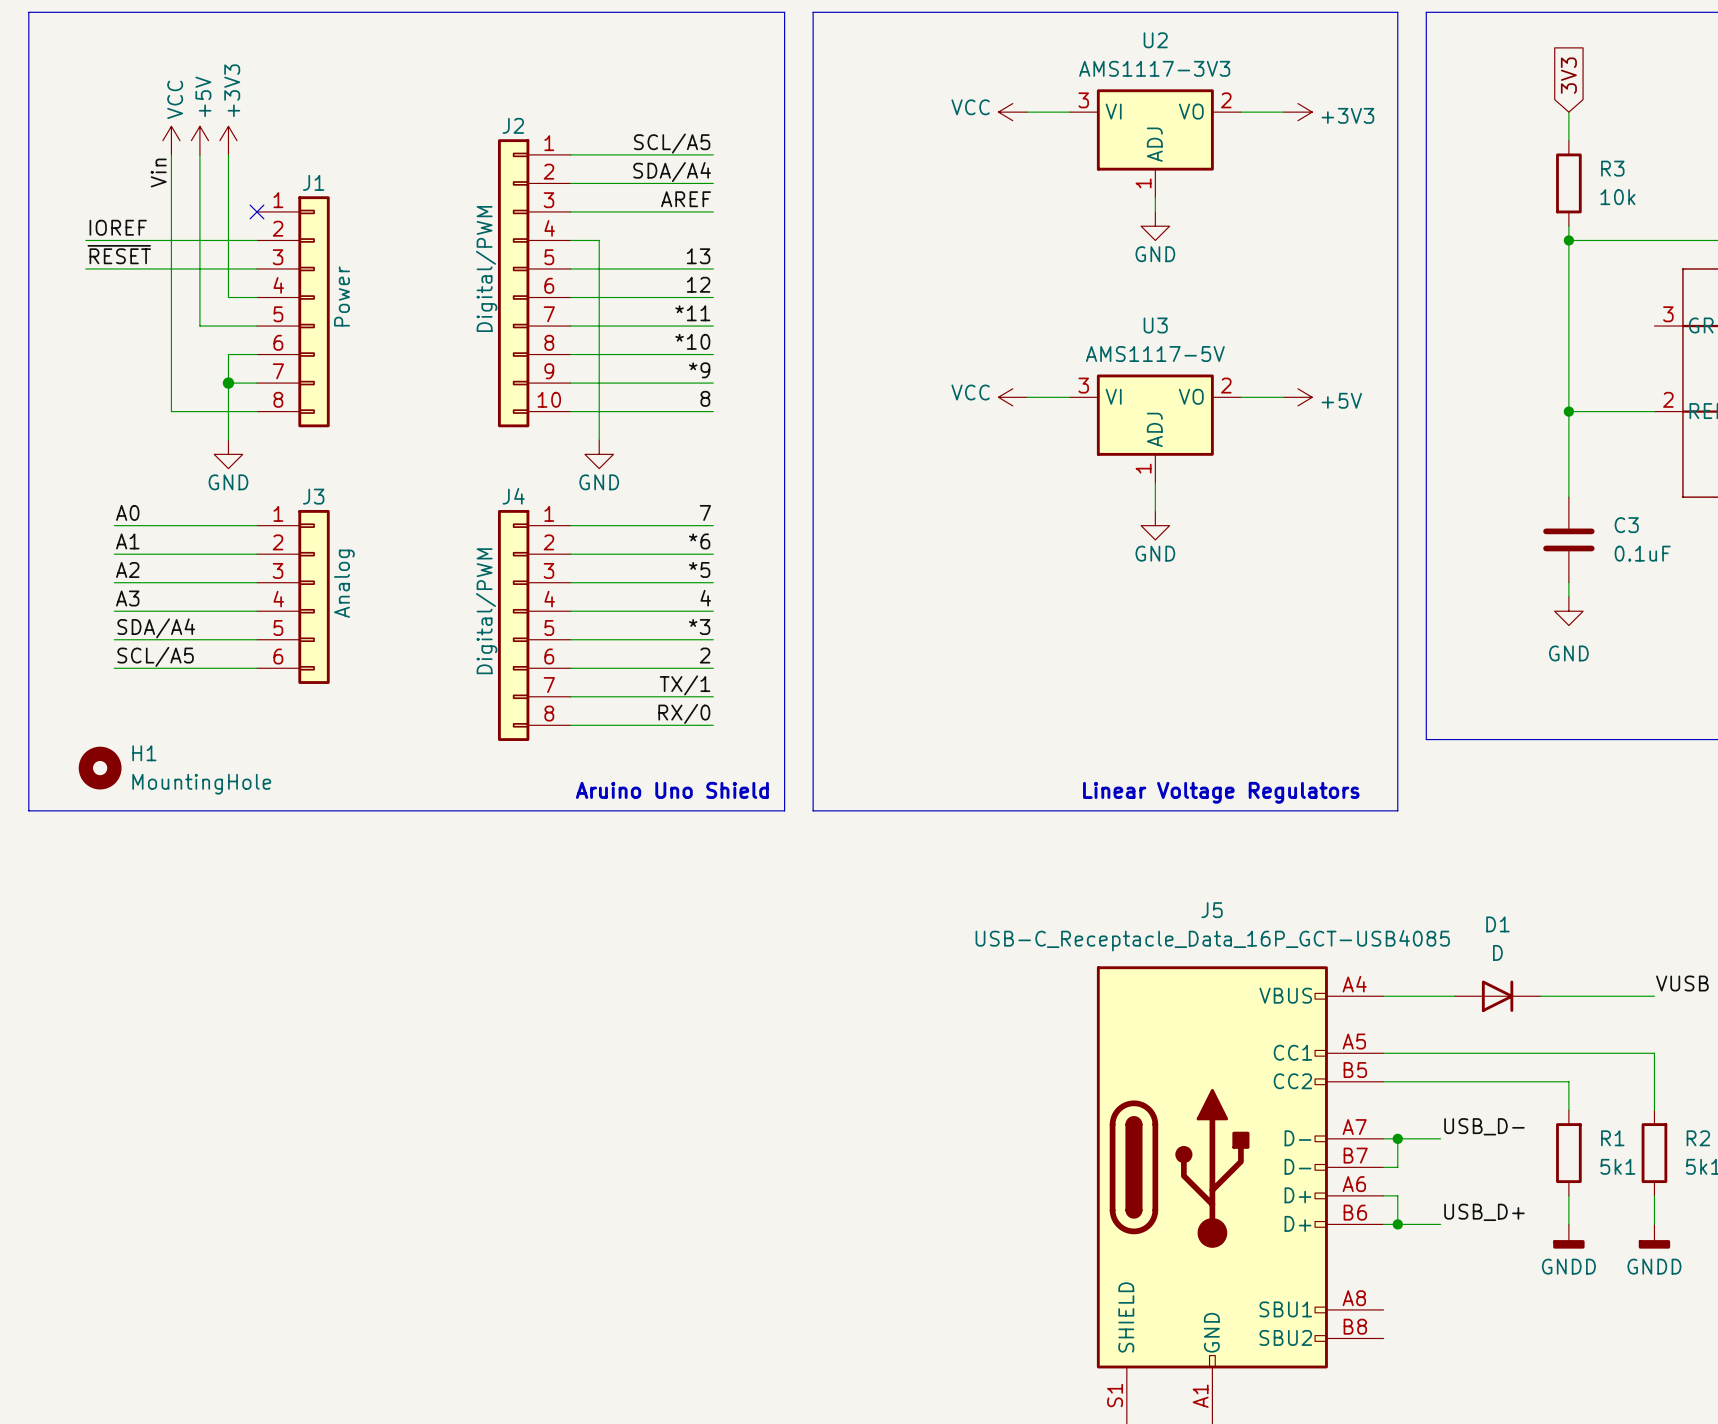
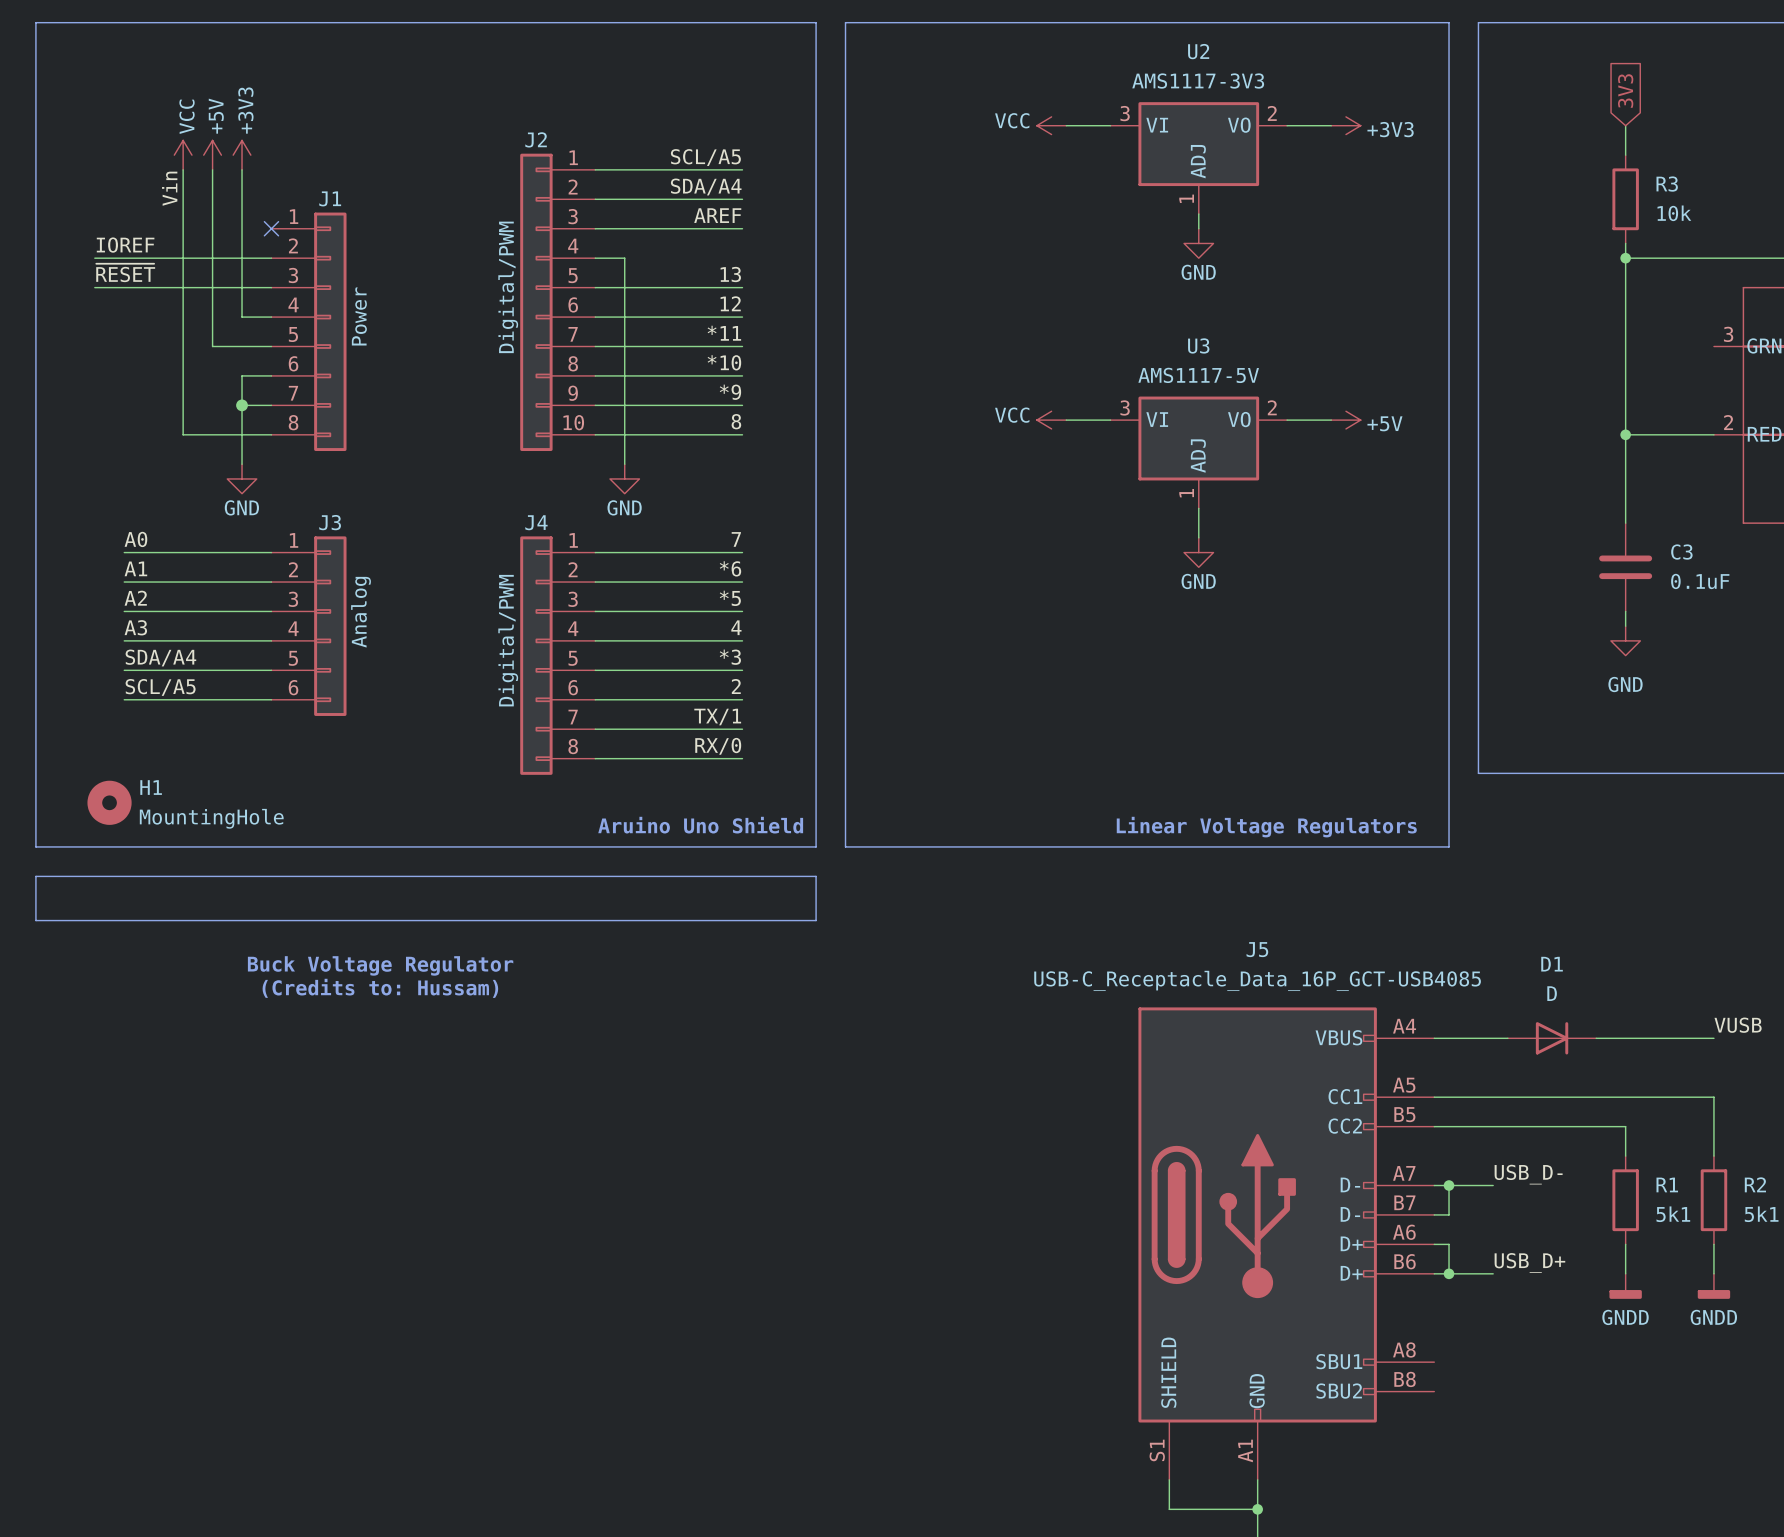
line: none -> (35, 876) (816, 876) (816, 920) (35, 920) (35, 876)
text: none -> Buck Voltage Regulator (380, 965)
text: none -> (Credits to: Hussam) (380, 988)

